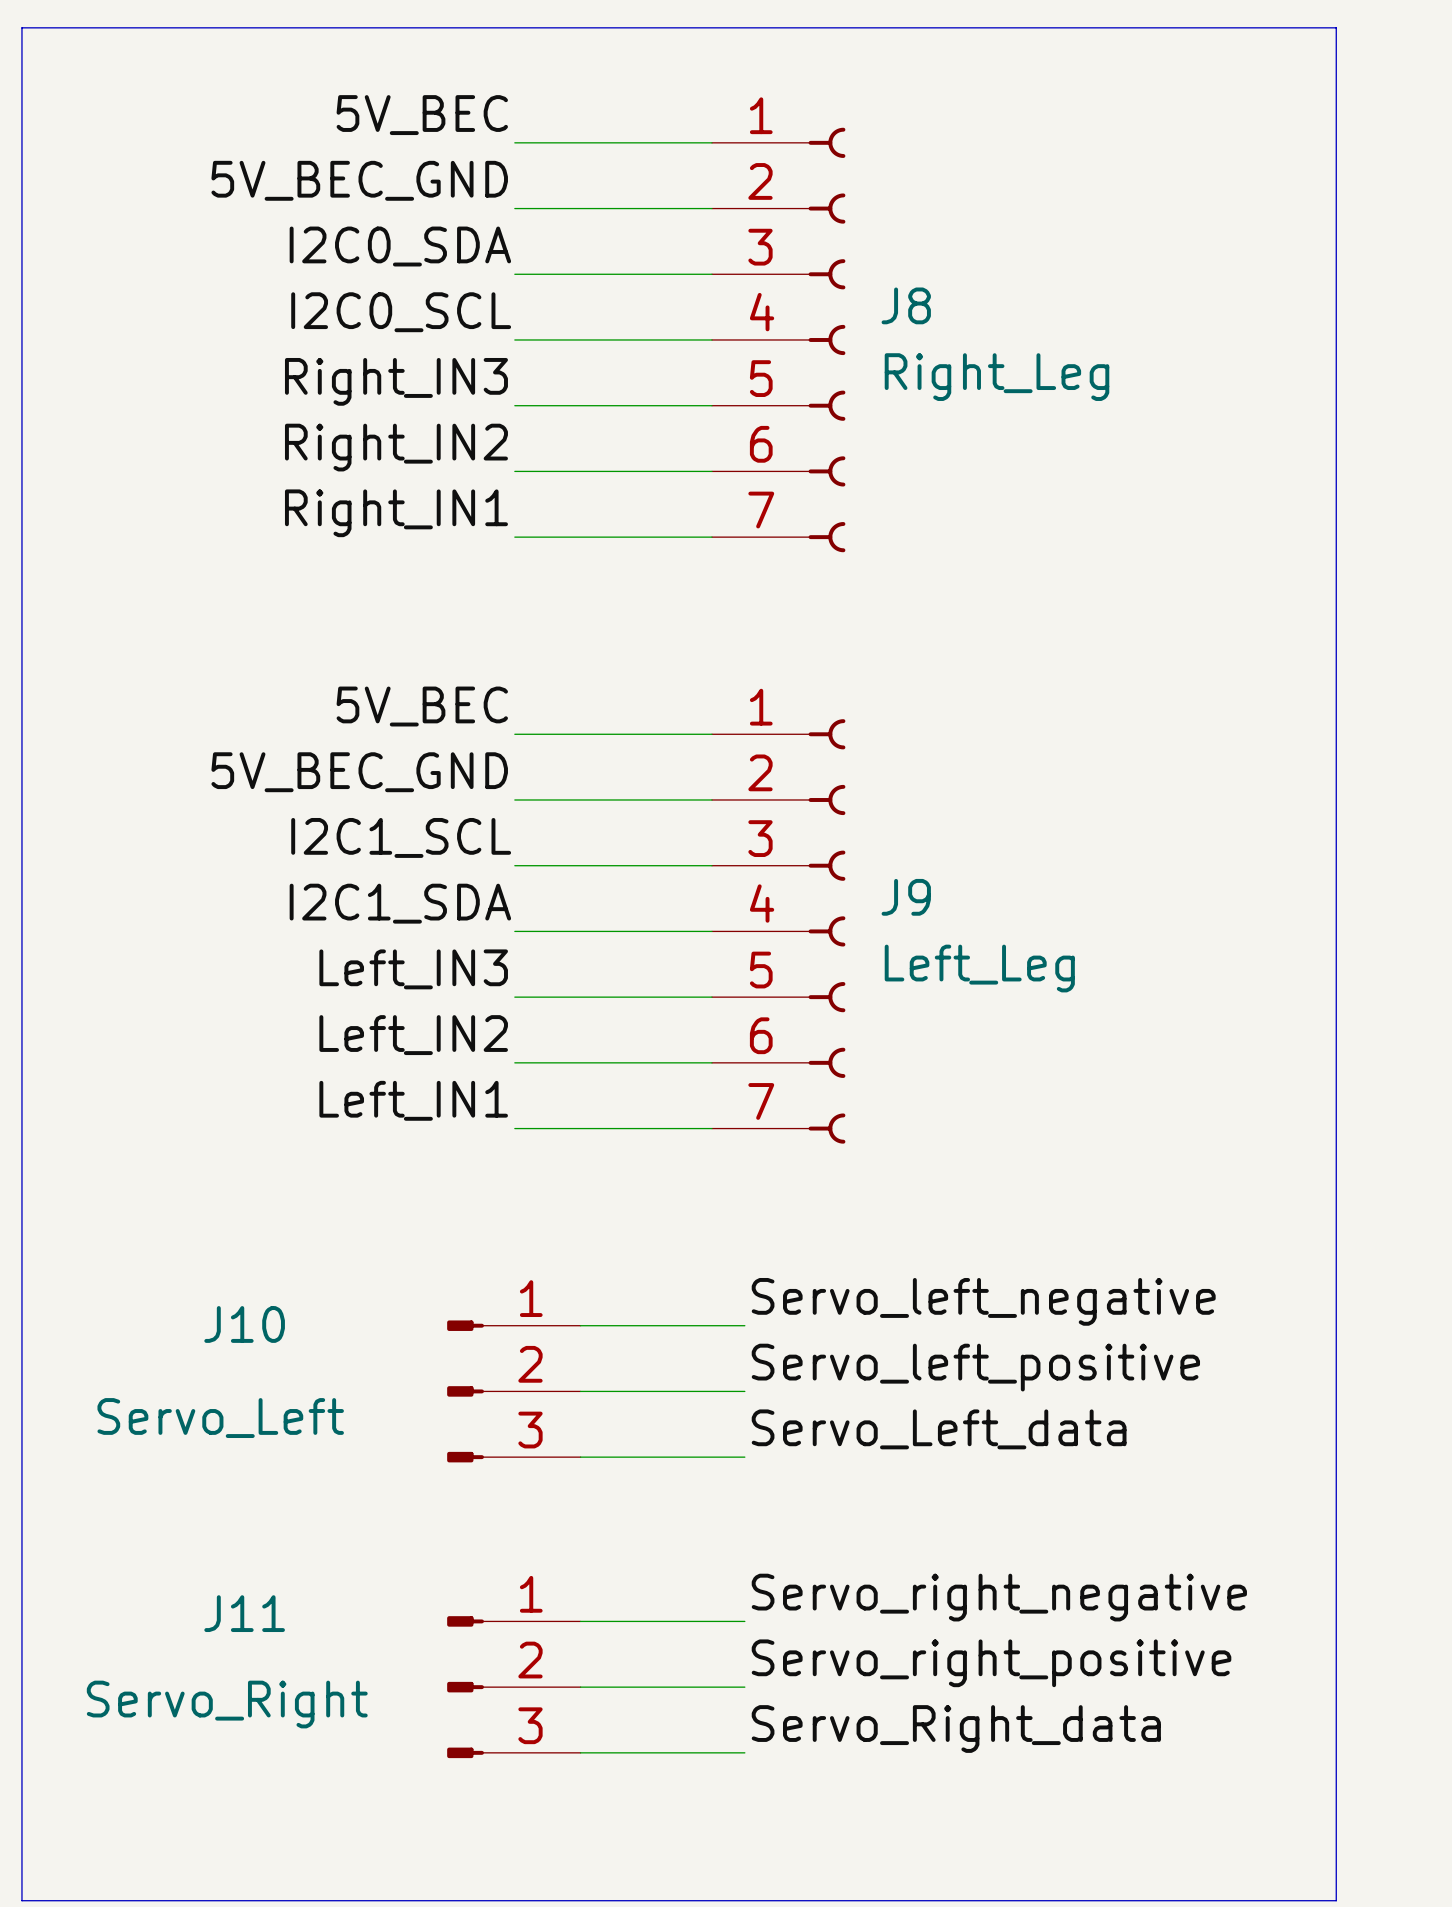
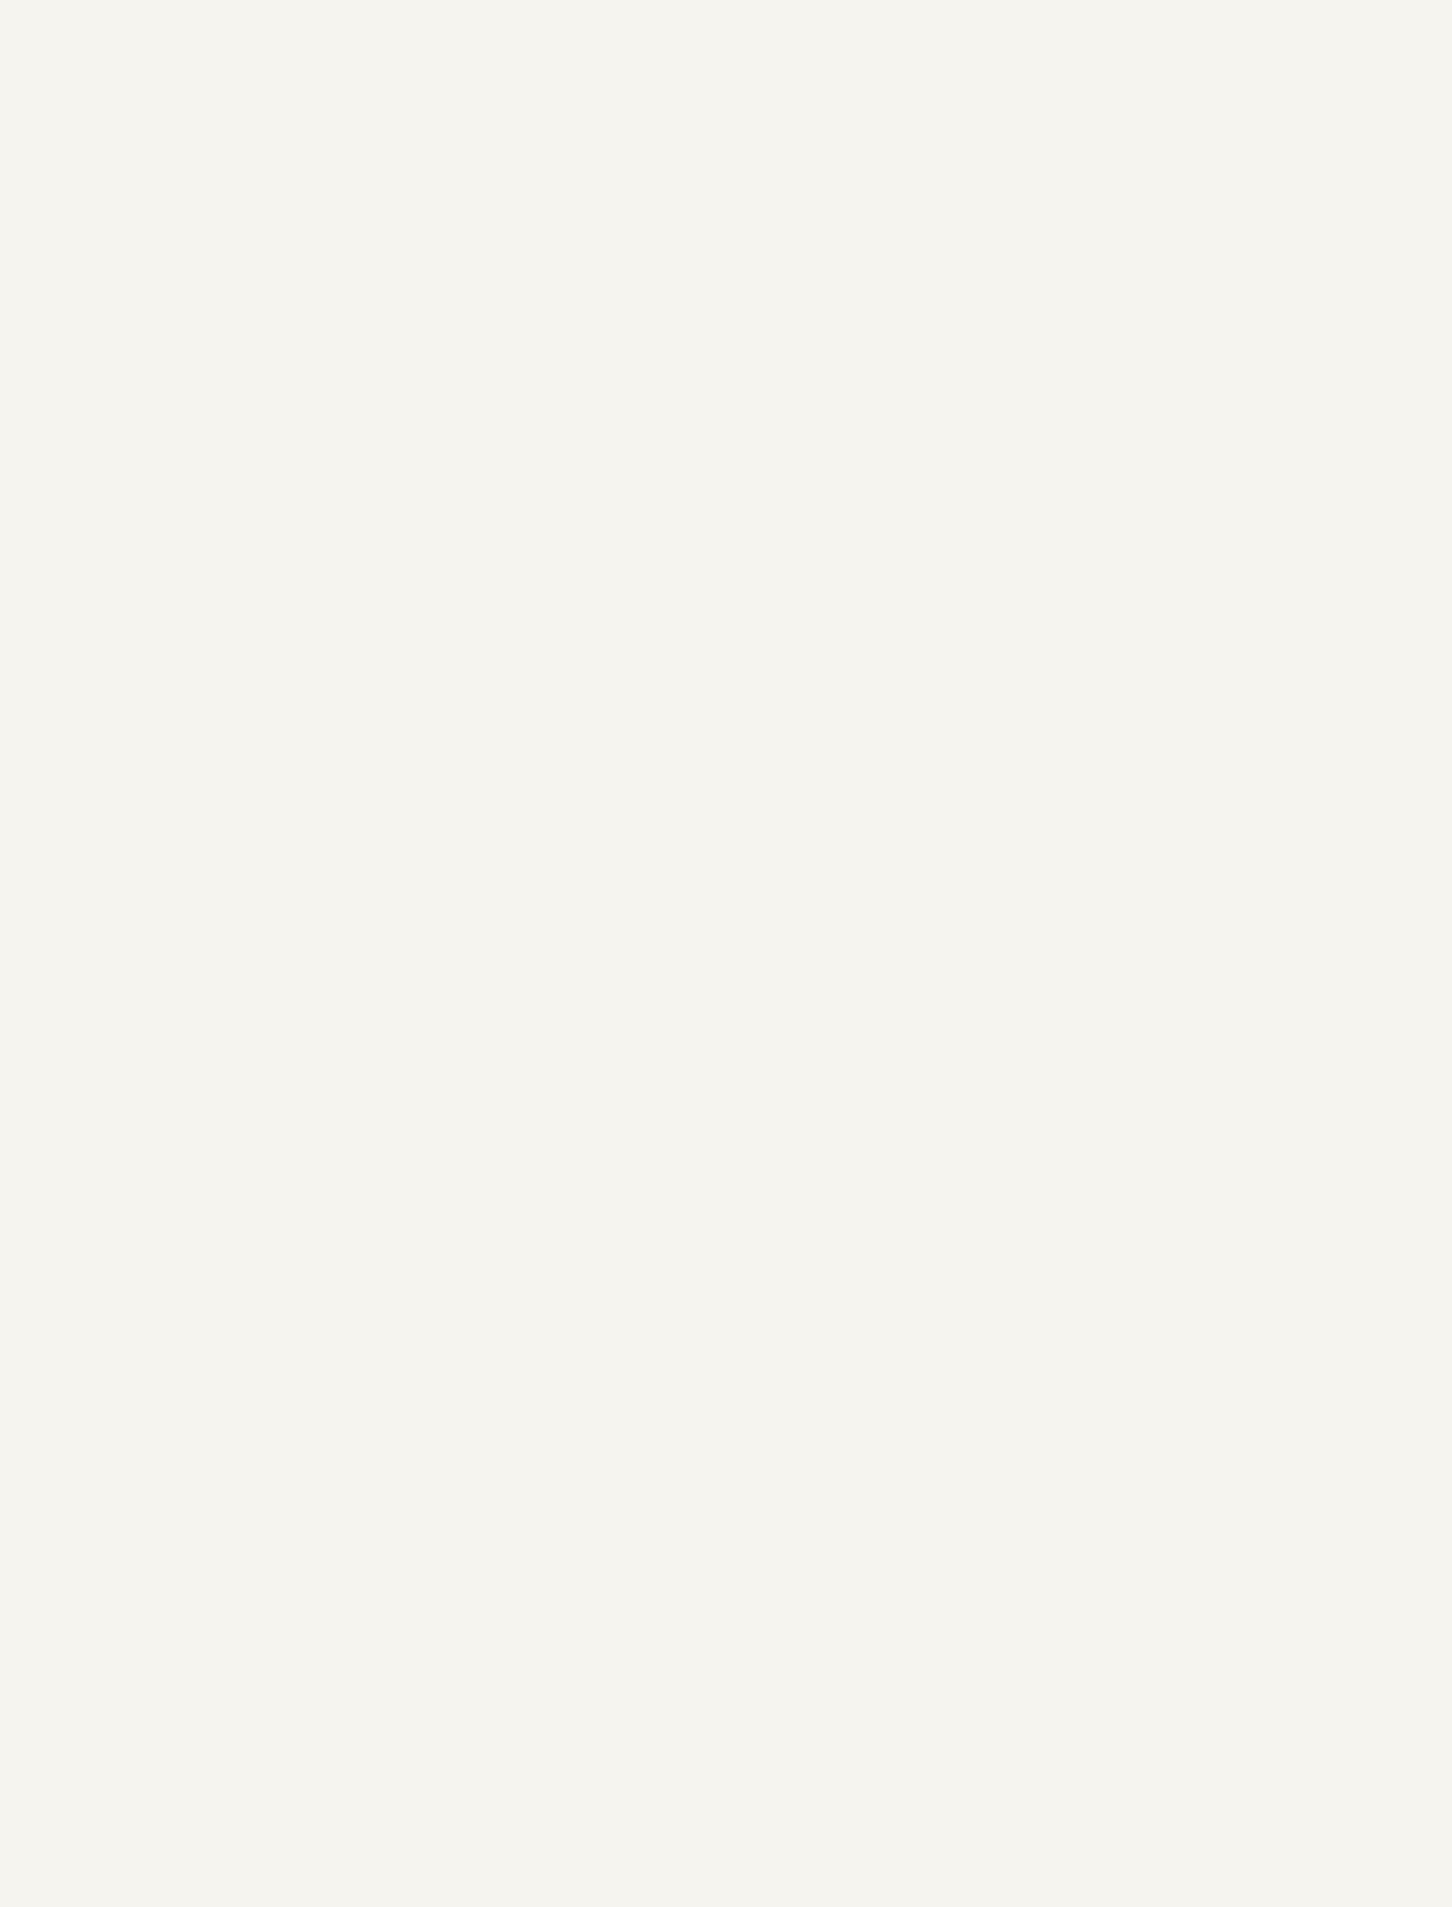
line: (21, 27) (1336, 27) (1336, 1900) (21, 1900) (21, 27) -> none
label: 5V_BEC (422, 115) -> none
wire: (514, 142) (711, 142) -> none
label: 5V_BEC_GND (359, 180) -> none
wire: (514, 208) (711, 208) -> none
label: I2C0_SDA (400, 246) -> none
wire: (514, 274) (711, 274) -> none
label: I2C0_SCL (401, 312) -> none
wire: (514, 339) (711, 339) -> none
J8: Right_Leg (778, 339) -> none
label: Right_IN3 (396, 381) -> none
wire: (514, 405) (711, 405) -> none
label: Right_IN2 (396, 447) -> none
wire: (514, 471) (711, 471) -> none
label: Right_IN1 (396, 513) -> none
wire: (514, 537) (711, 537) -> none
label: 5V_BEC (422, 706) -> none
wire: (514, 734) (711, 734) -> none
label: 5V_BEC_GND (359, 772) -> none
wire: (514, 799) (711, 799) -> none
label: I2C1_SCL (401, 837) -> none
wire: (514, 865) (711, 865) -> none
label: I2C1_SDA (400, 903) -> none
wire: (514, 931) (711, 931) -> none
J9: Left_Leg (778, 931) -> none
label: Left_IN3 (413, 969) -> none
wire: (514, 997) (711, 997) -> none
label: Left_IN2 (413, 1035) -> none
wire: (514, 1062) (711, 1062) -> none
label: Left_IN1 (413, 1100) -> none
wire: (514, 1128) (711, 1128) -> none
label: Servo_left_negative (983, 1301) -> none
wire: (580, 1325) (744, 1325) -> none
label: Servo_left_positive (975, 1367) -> none
J10: Servo_Left (513, 1391) -> none
wire: (580, 1391) (744, 1391) -> none
label: Servo_Left_data (939, 1429) -> none
wire: (580, 1457) (744, 1457) -> none
label: Servo_right_negative (999, 1597) -> none
wire: (580, 1621) (744, 1621) -> none
label: Servo_right_positive (991, 1663) -> none
J11: Servo_Right (513, 1687) -> none
wire: (580, 1687) (744, 1687) -> none
label: Servo_Right_data (956, 1729) -> none
wire: (580, 1752) (744, 1752) -> none

